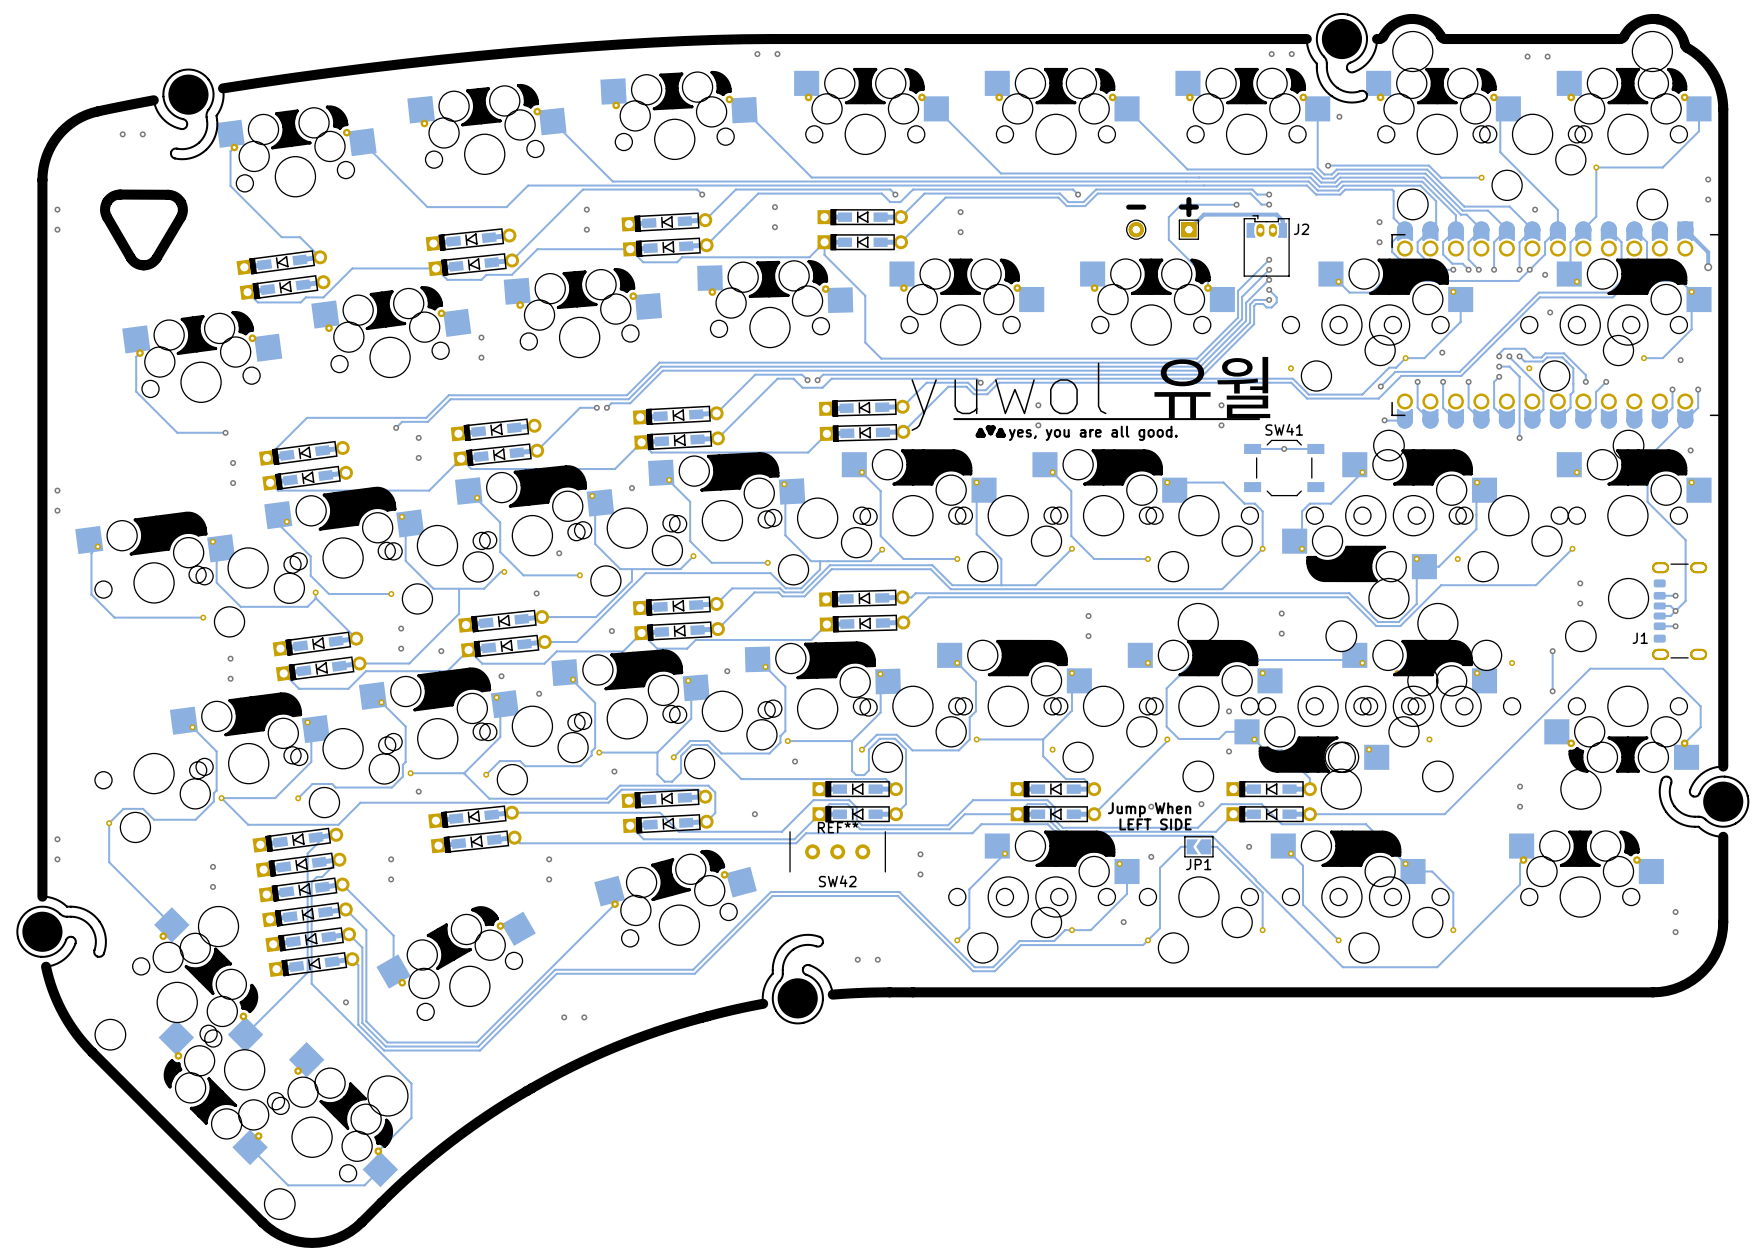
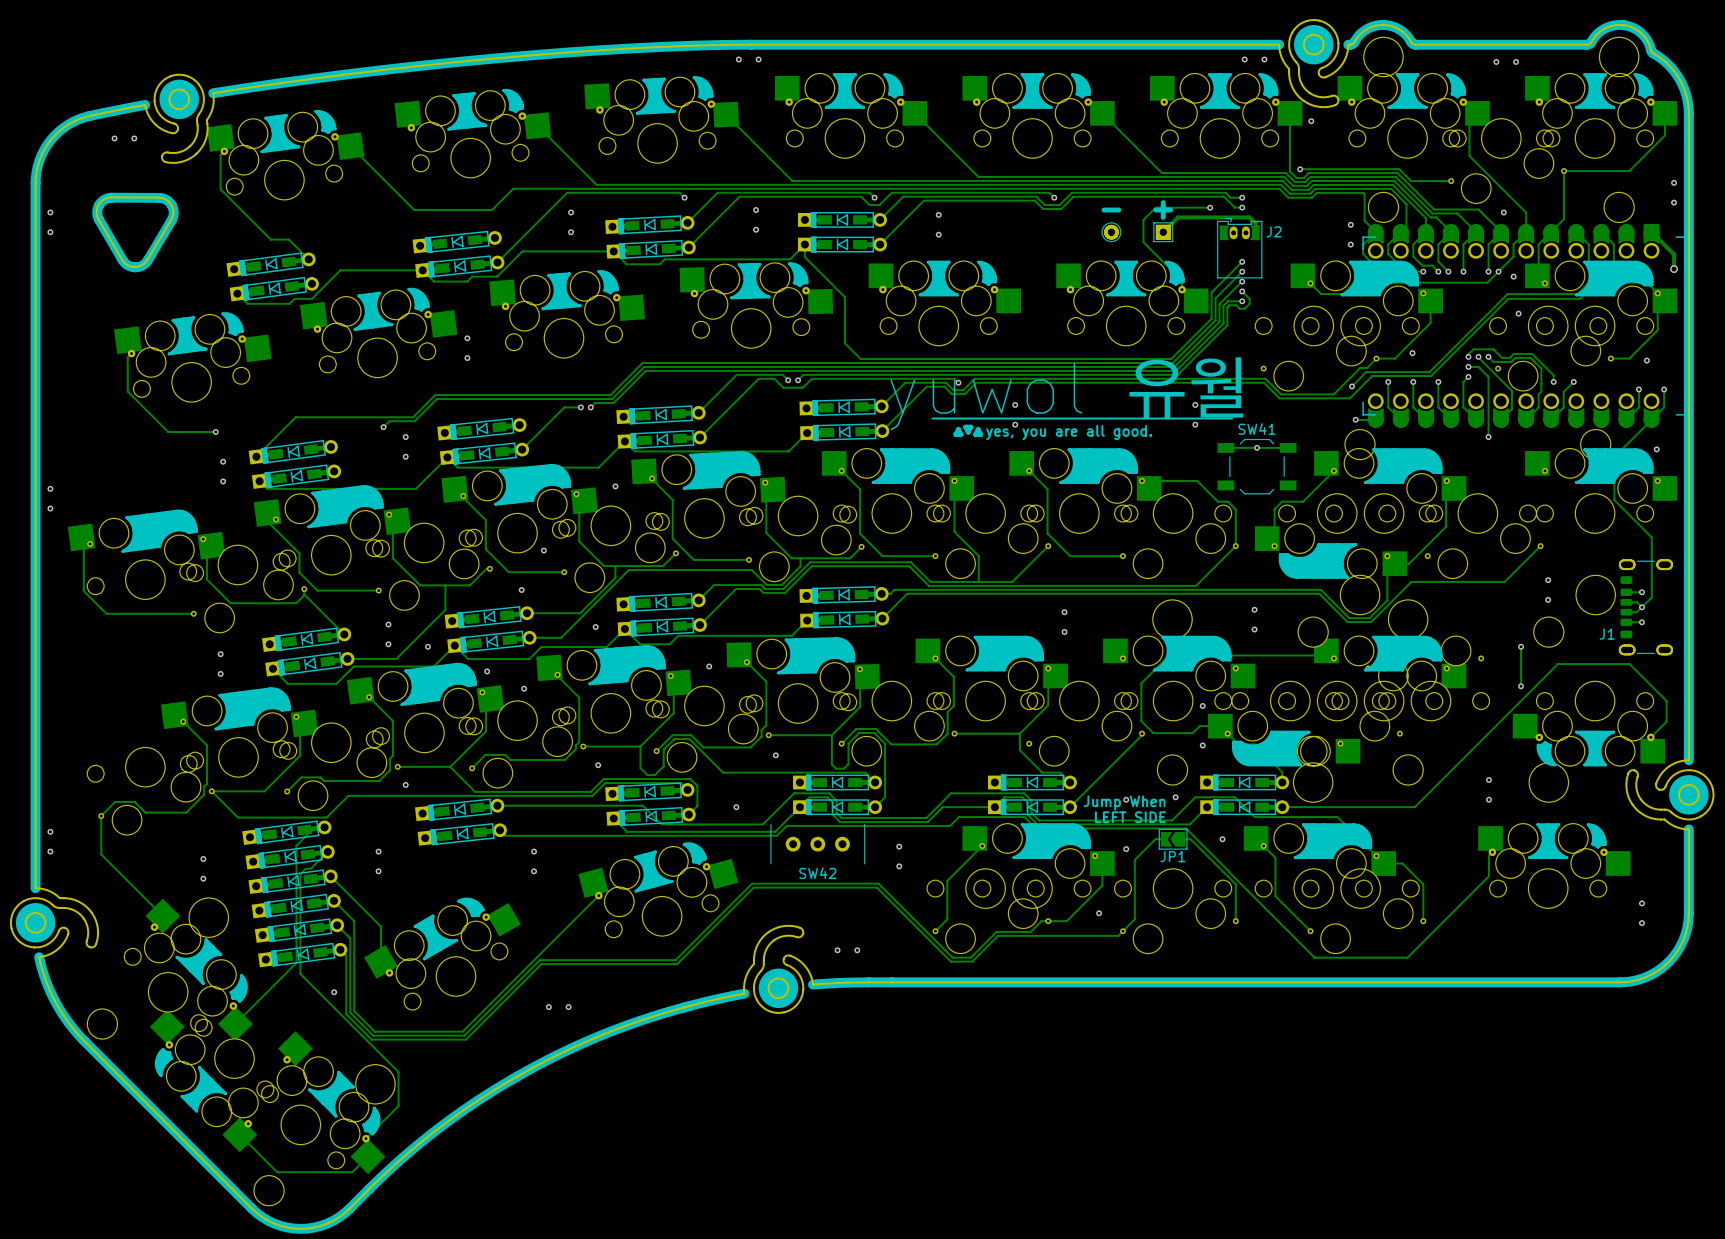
part text: REF** (838, 827) -> none

